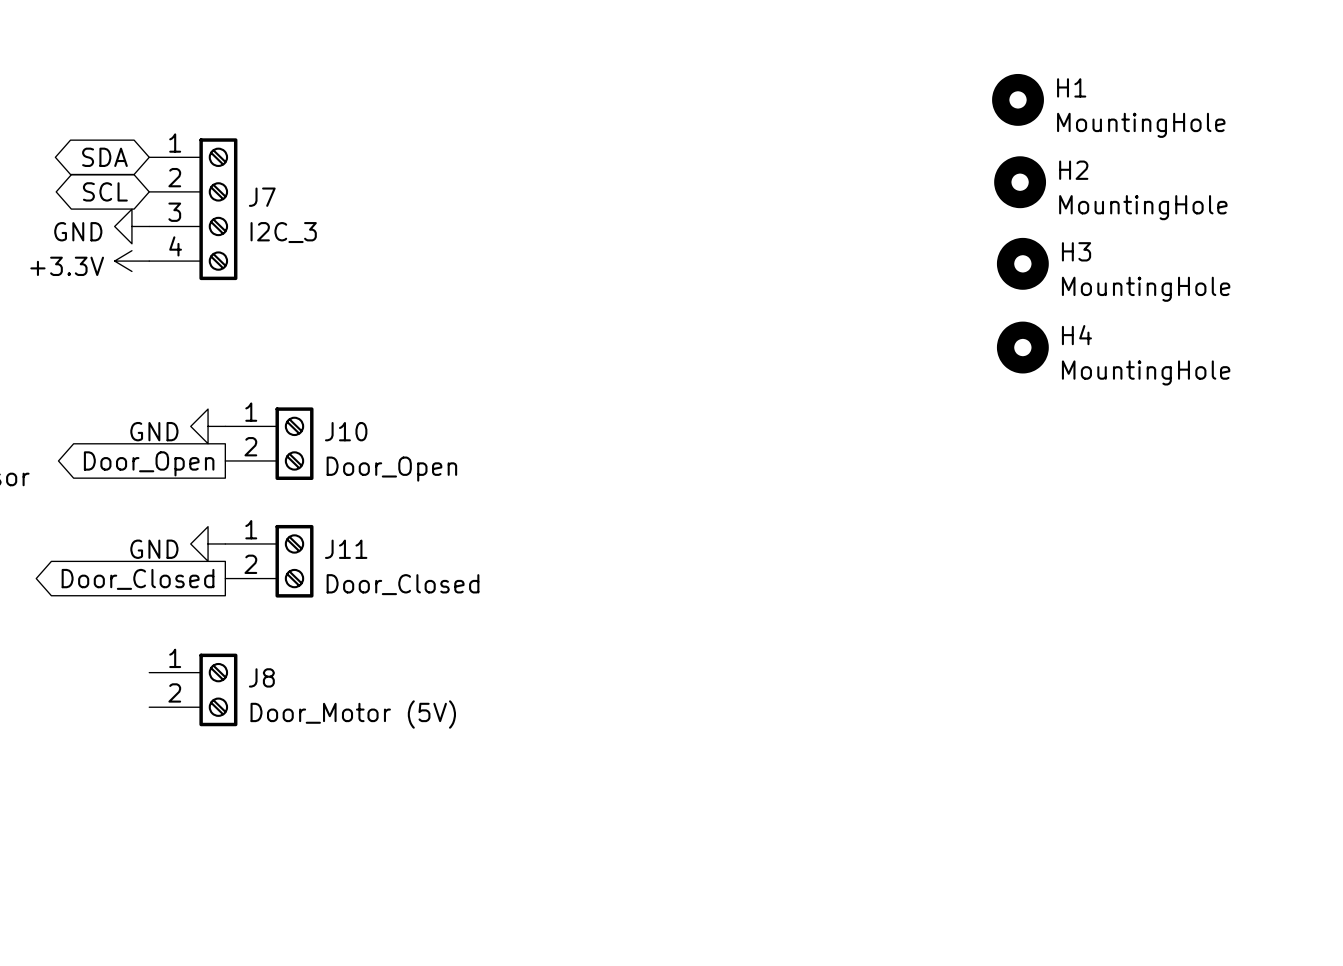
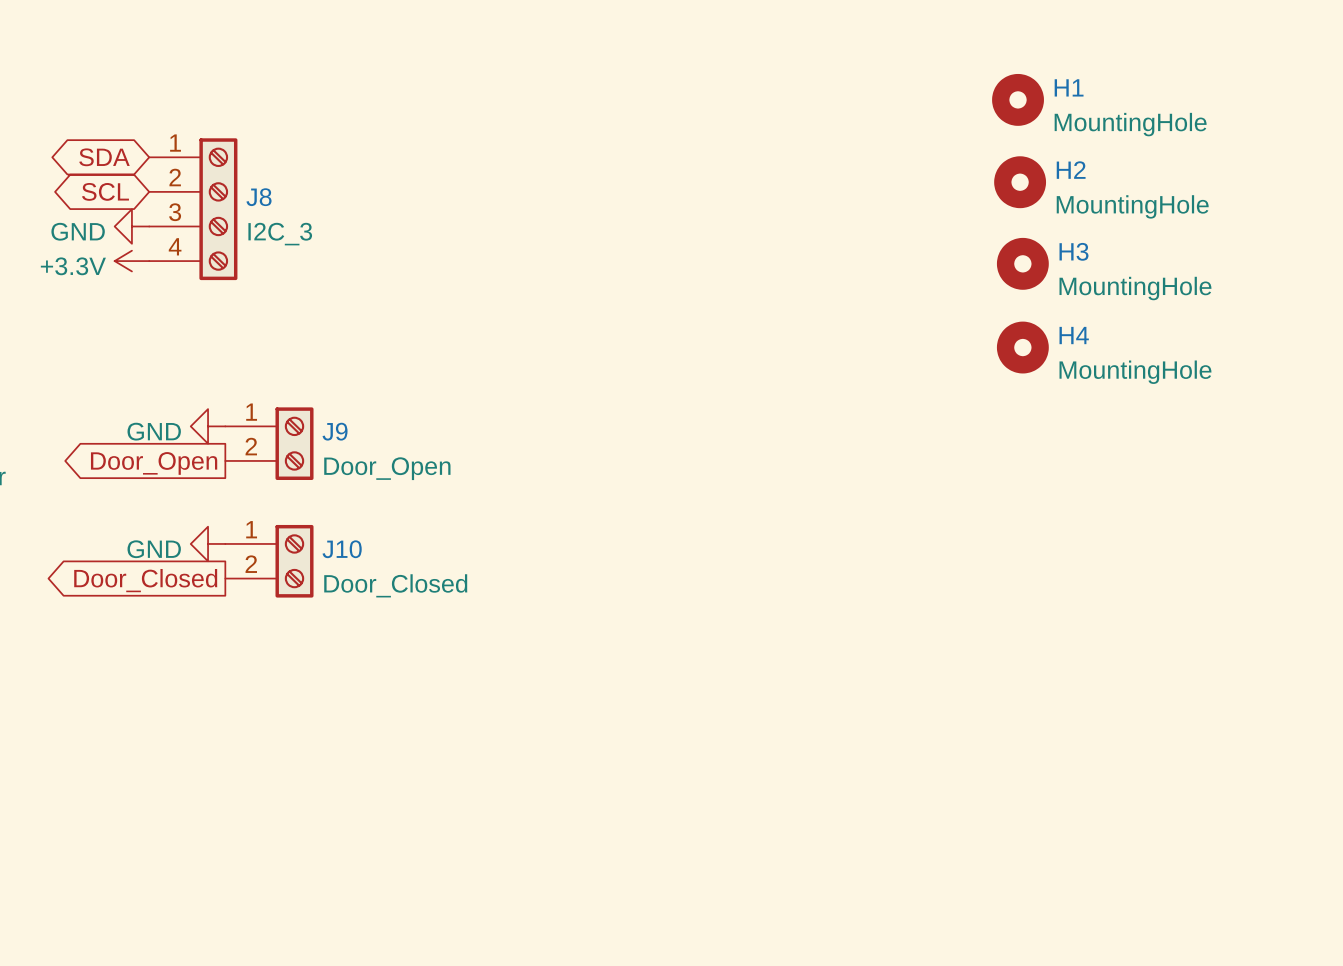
J7 name: J7 (262, 197) -> J8 (259, 197)
J10 name: J10 (346, 431) -> J9 (335, 431)
J11 name: J11 (346, 549) -> J10 (342, 549)
J8: Door_Motor (5V) (193, 689) -> none

